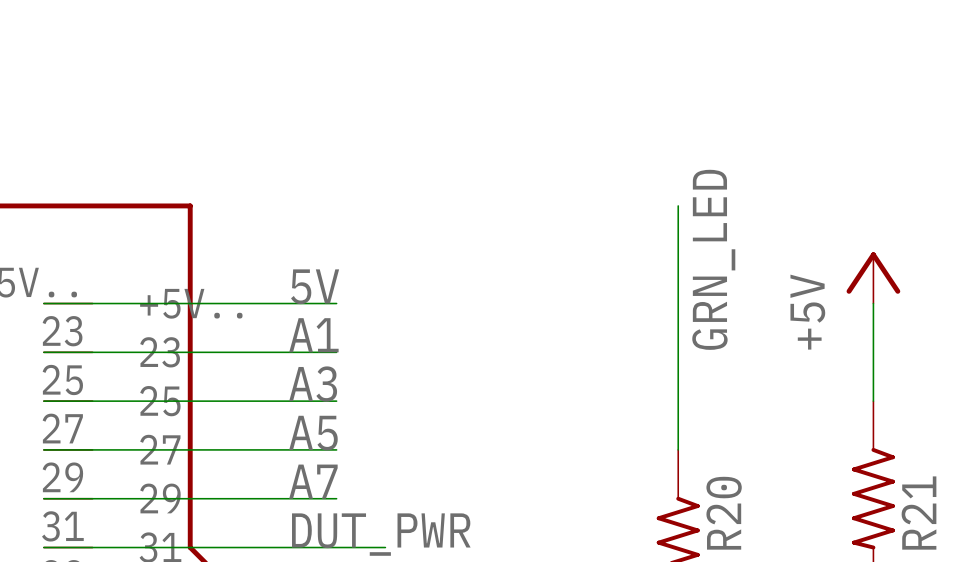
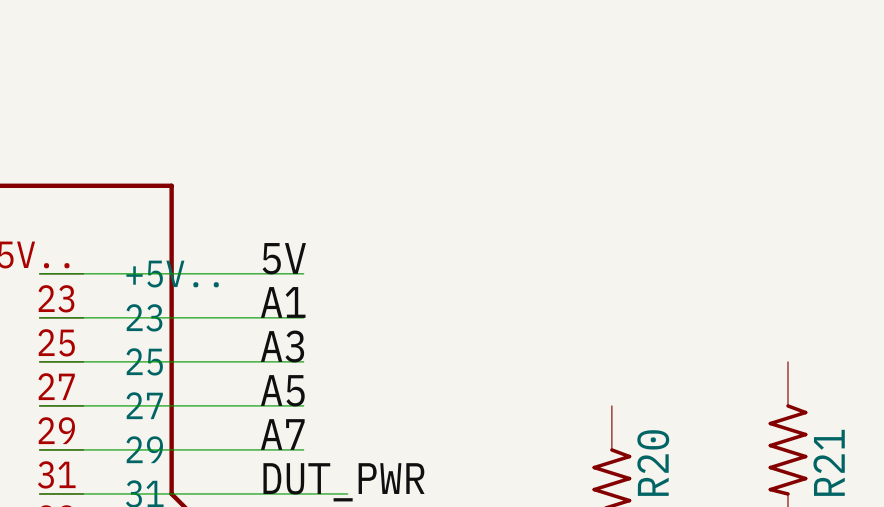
wire: (678, 205) (678, 449) -> none
label: GRN_LED (713, 259) -> none
power symbol: +5V (873, 277) -> none
wire: (873, 303) (873, 401) -> none

